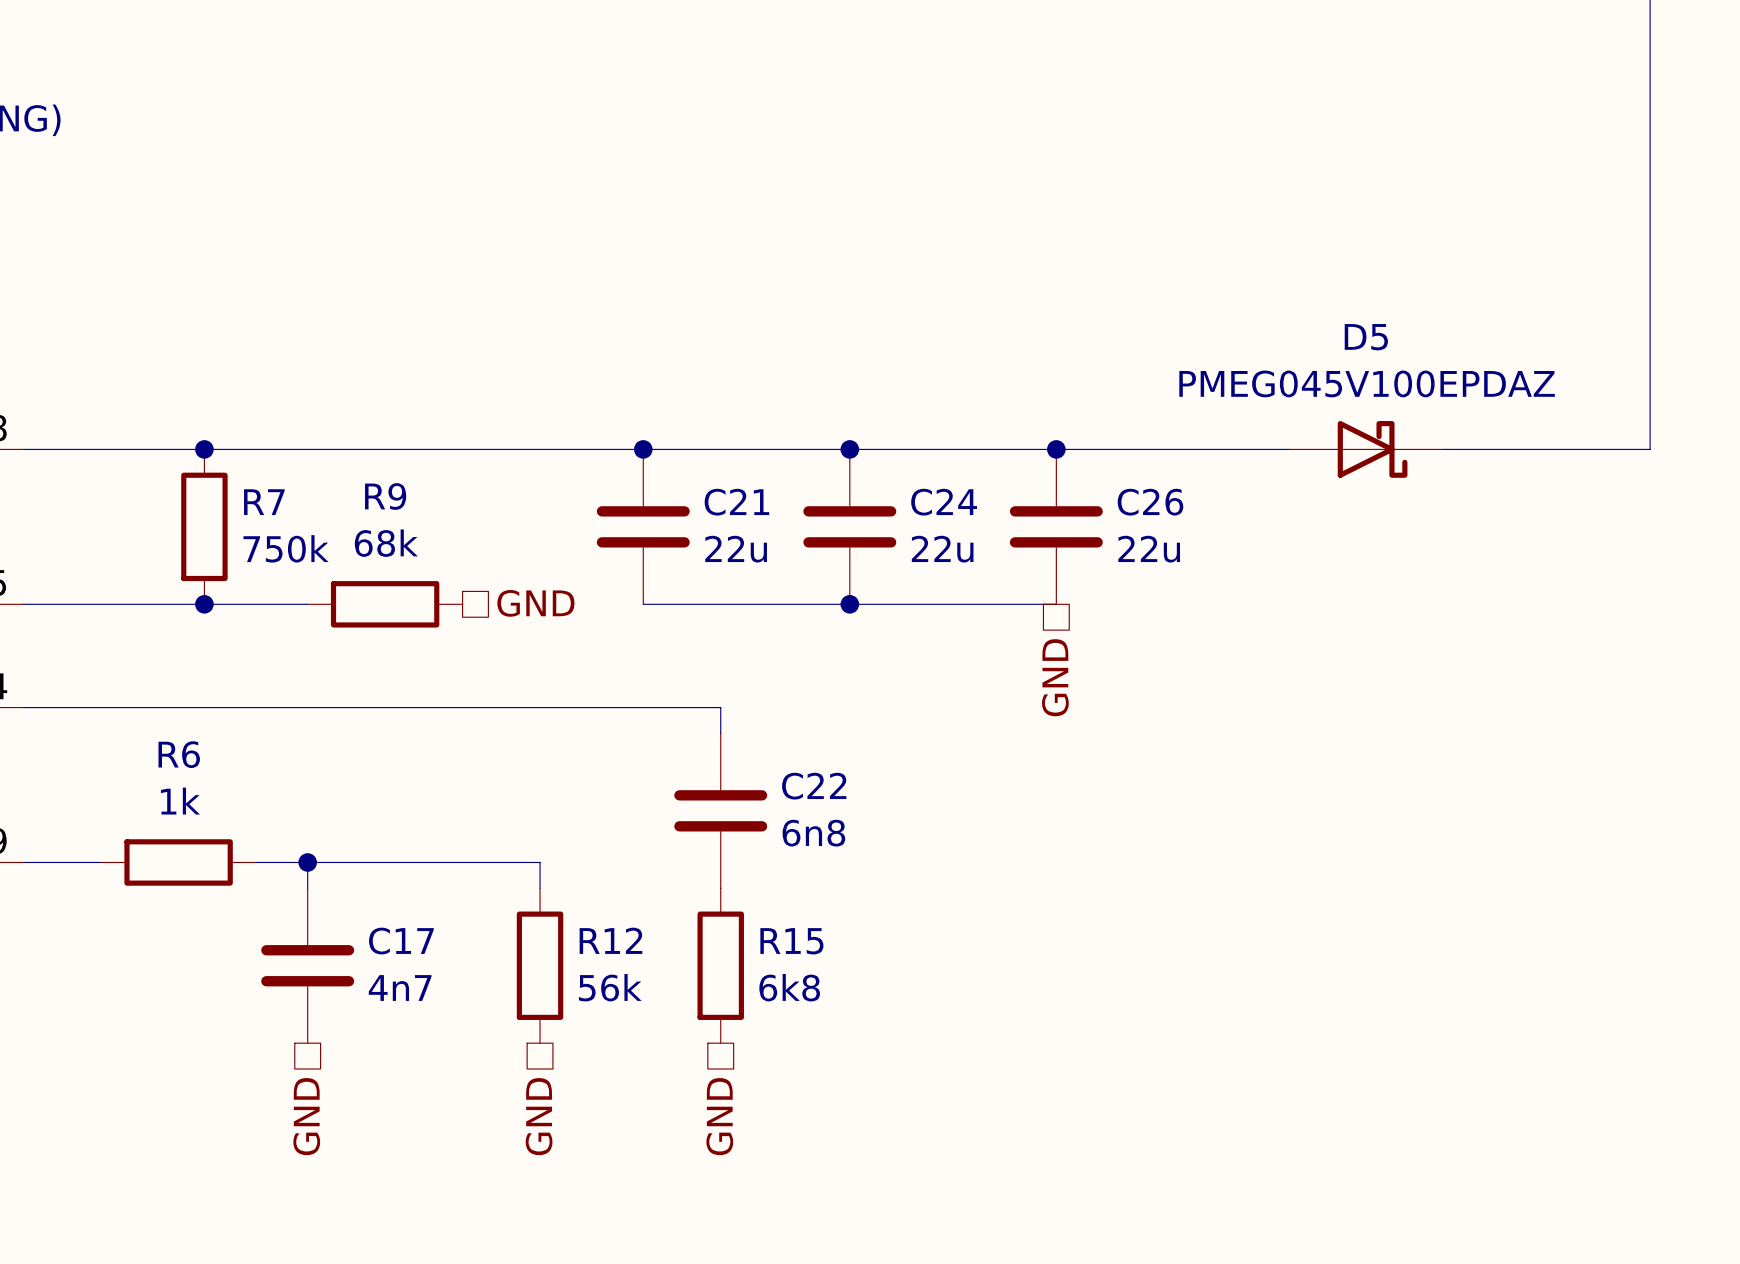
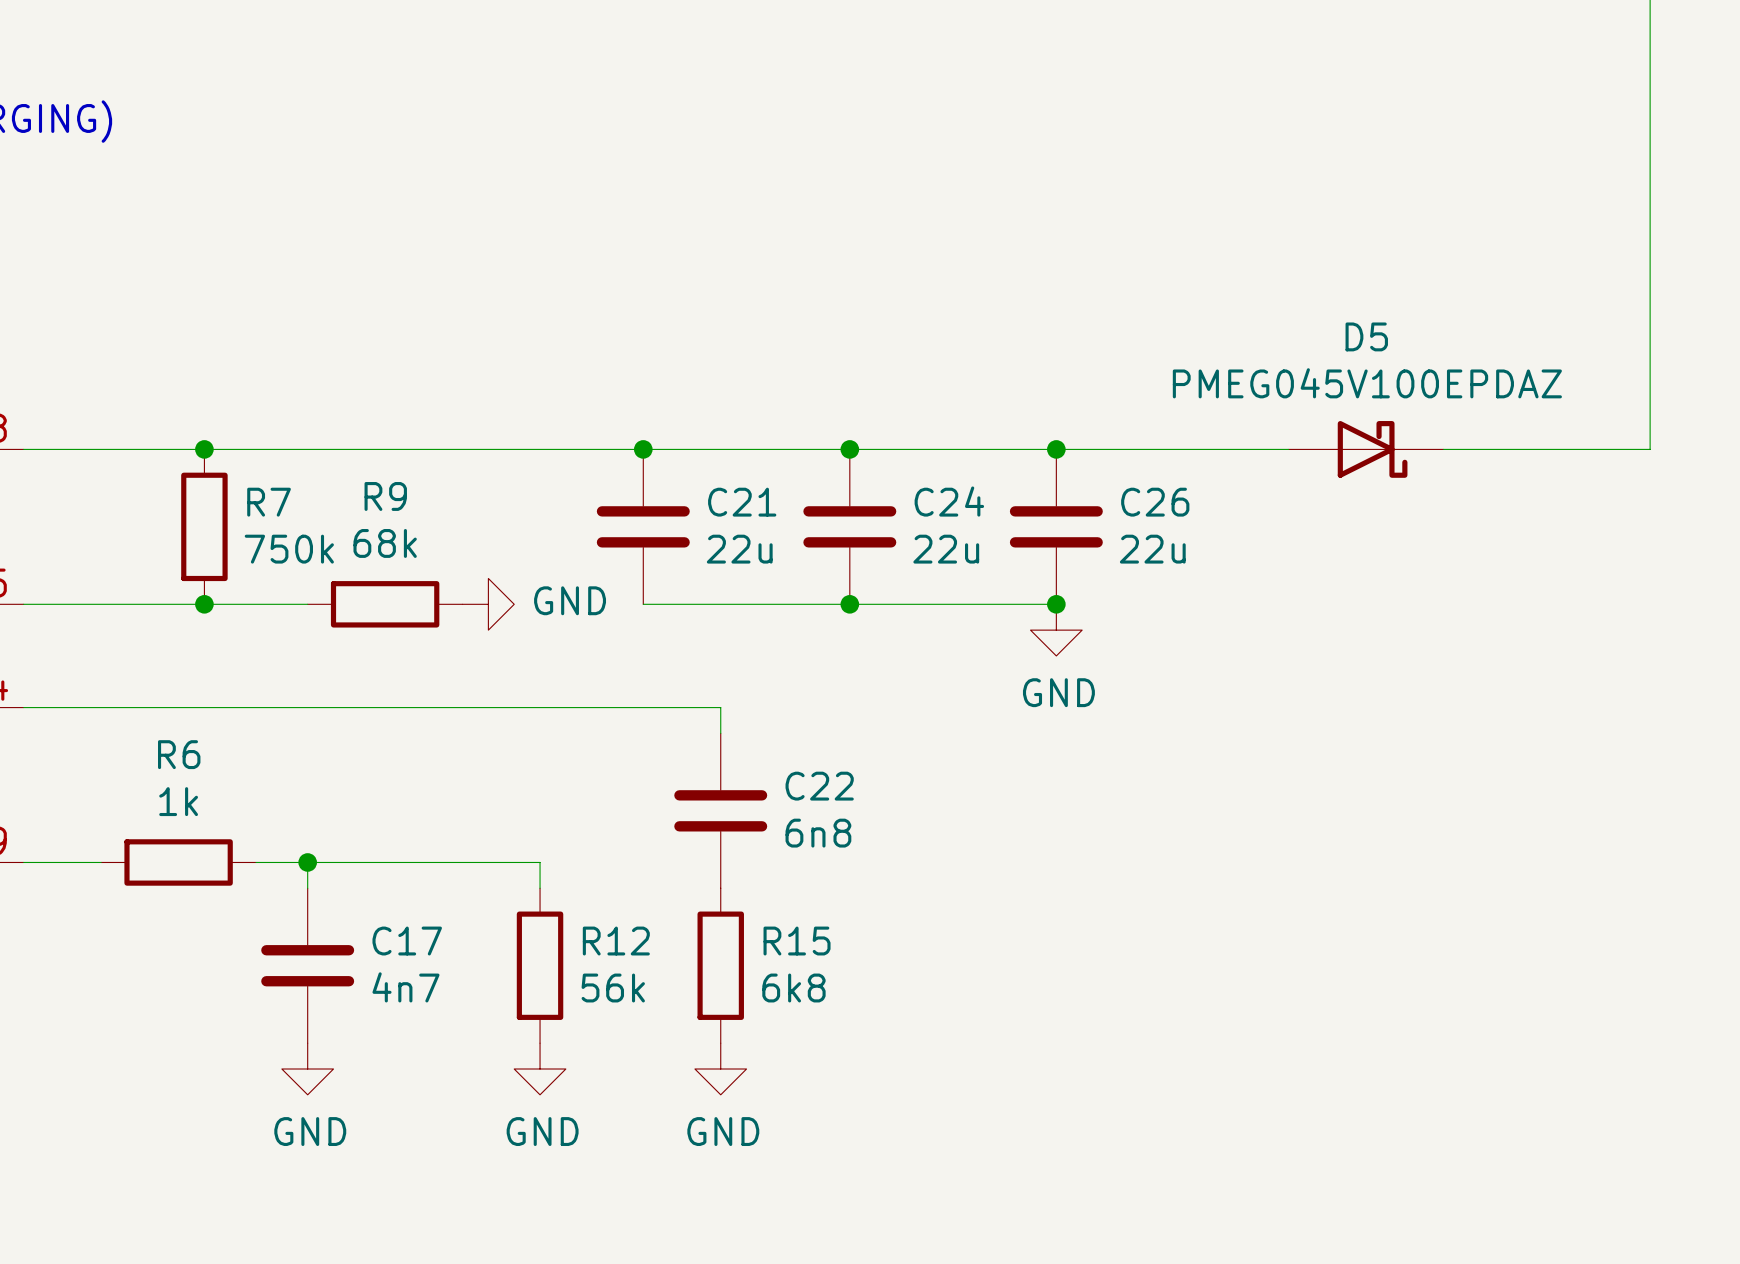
hierarchical label: GND (535, 603) -> none
power symbol: none -> GND (488, 604)
junction: none -> (1056, 604)
power symbol: none -> GND (1056, 630)
hierarchical label: GND (1055, 677) -> none
power symbol: none -> GND (307, 1069)
power symbol: none -> GND (540, 1069)
power symbol: none -> GND (720, 1069)
hierarchical label: GND (306, 1116) -> none
hierarchical label: GND (539, 1116) -> none
hierarchical label: GND (719, 1116) -> none

